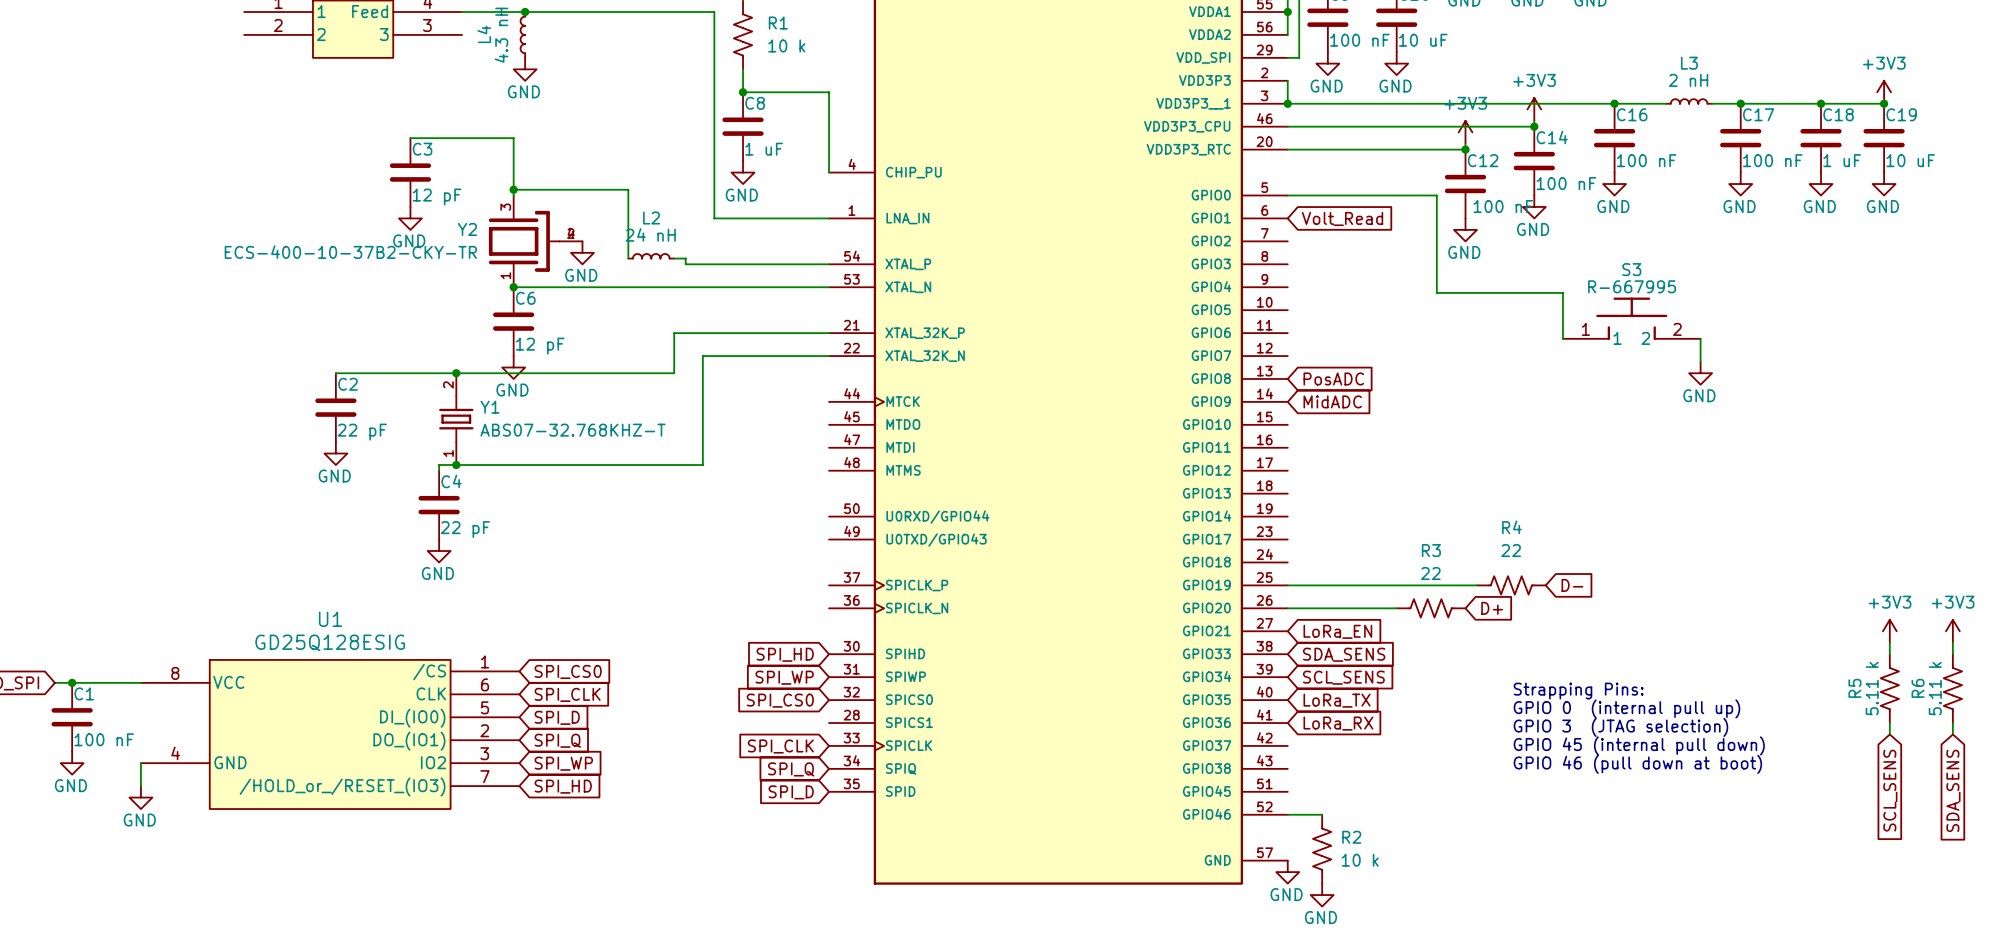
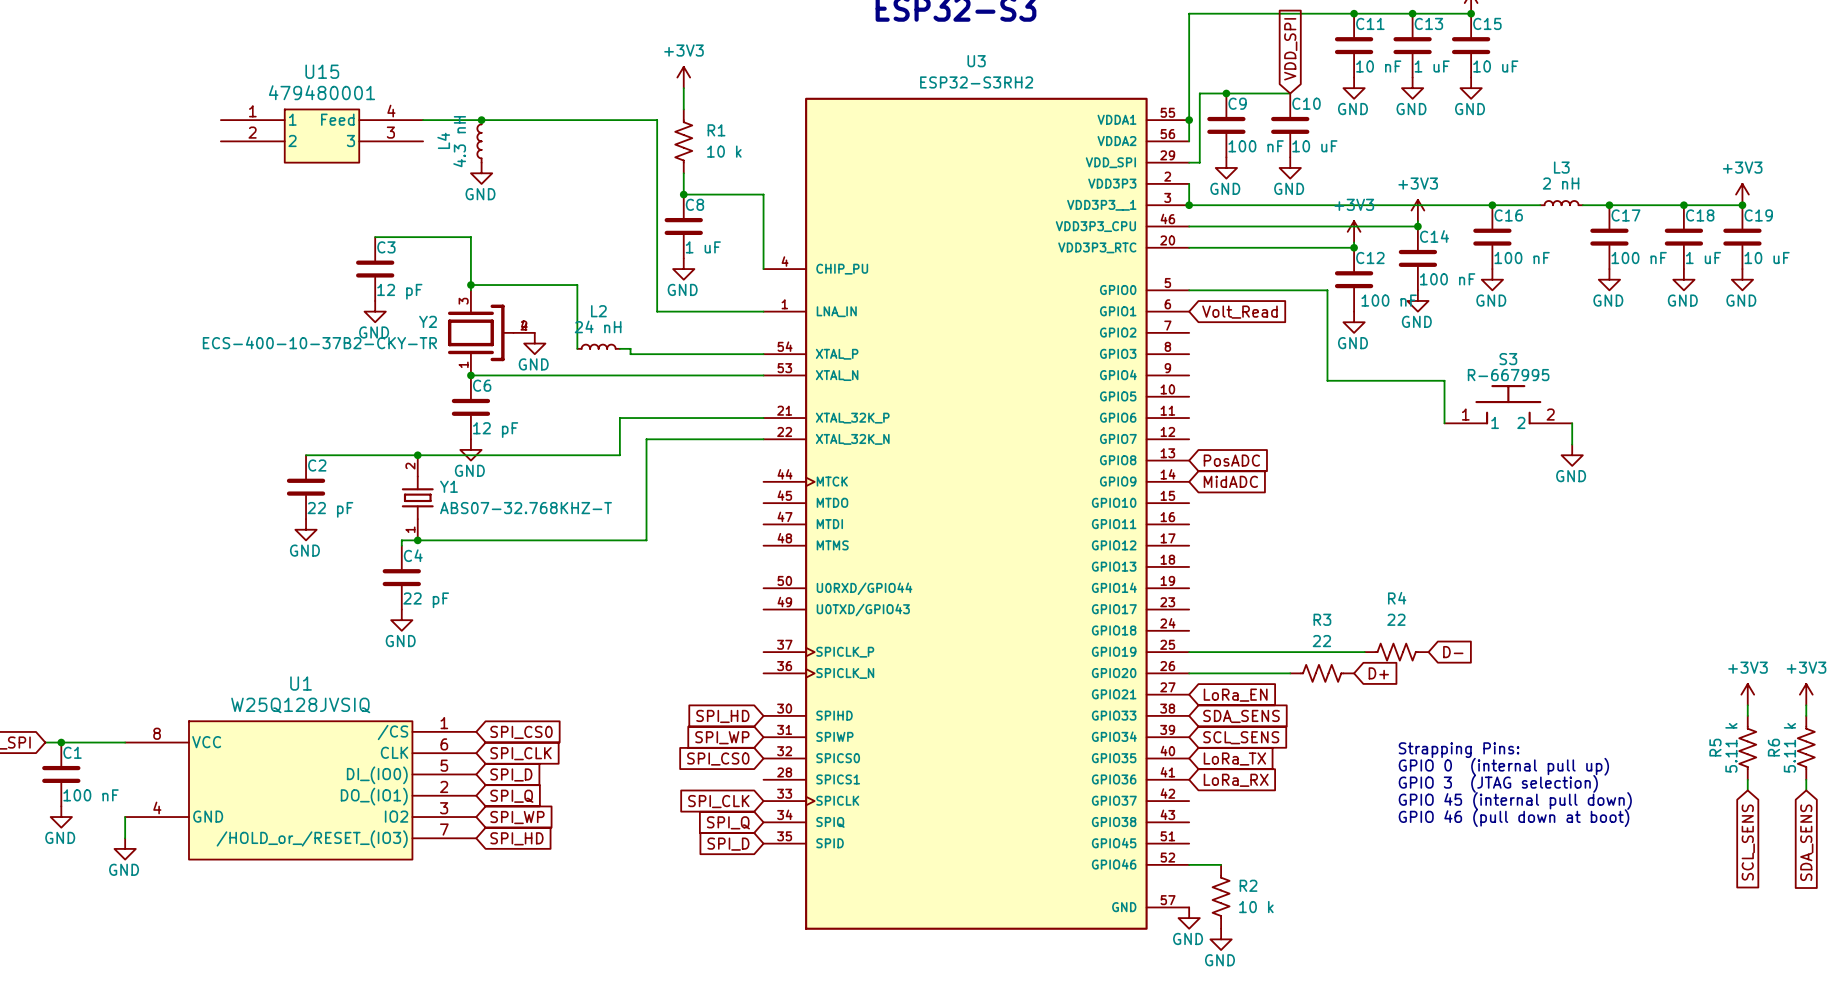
U1 value: GD25Q128ESIG (330, 642) -> W25Q128JVSIQ (300, 705)

